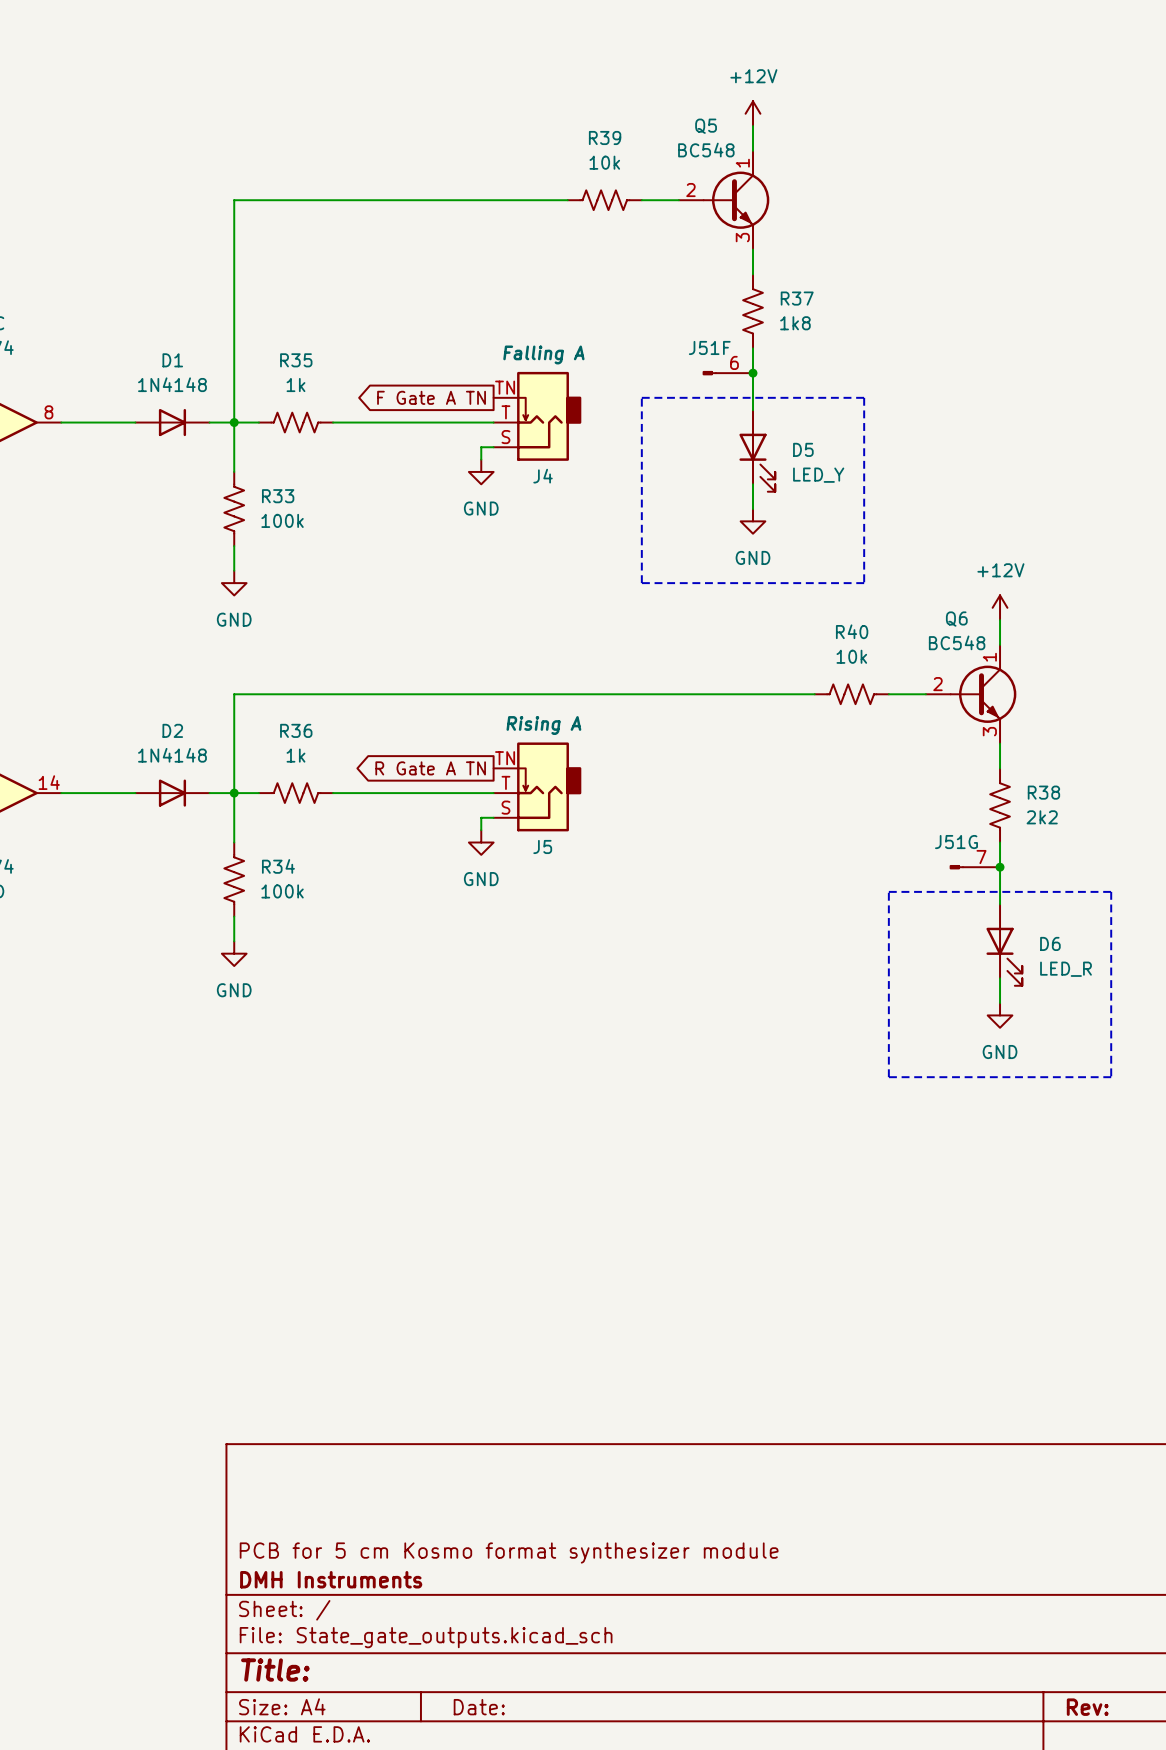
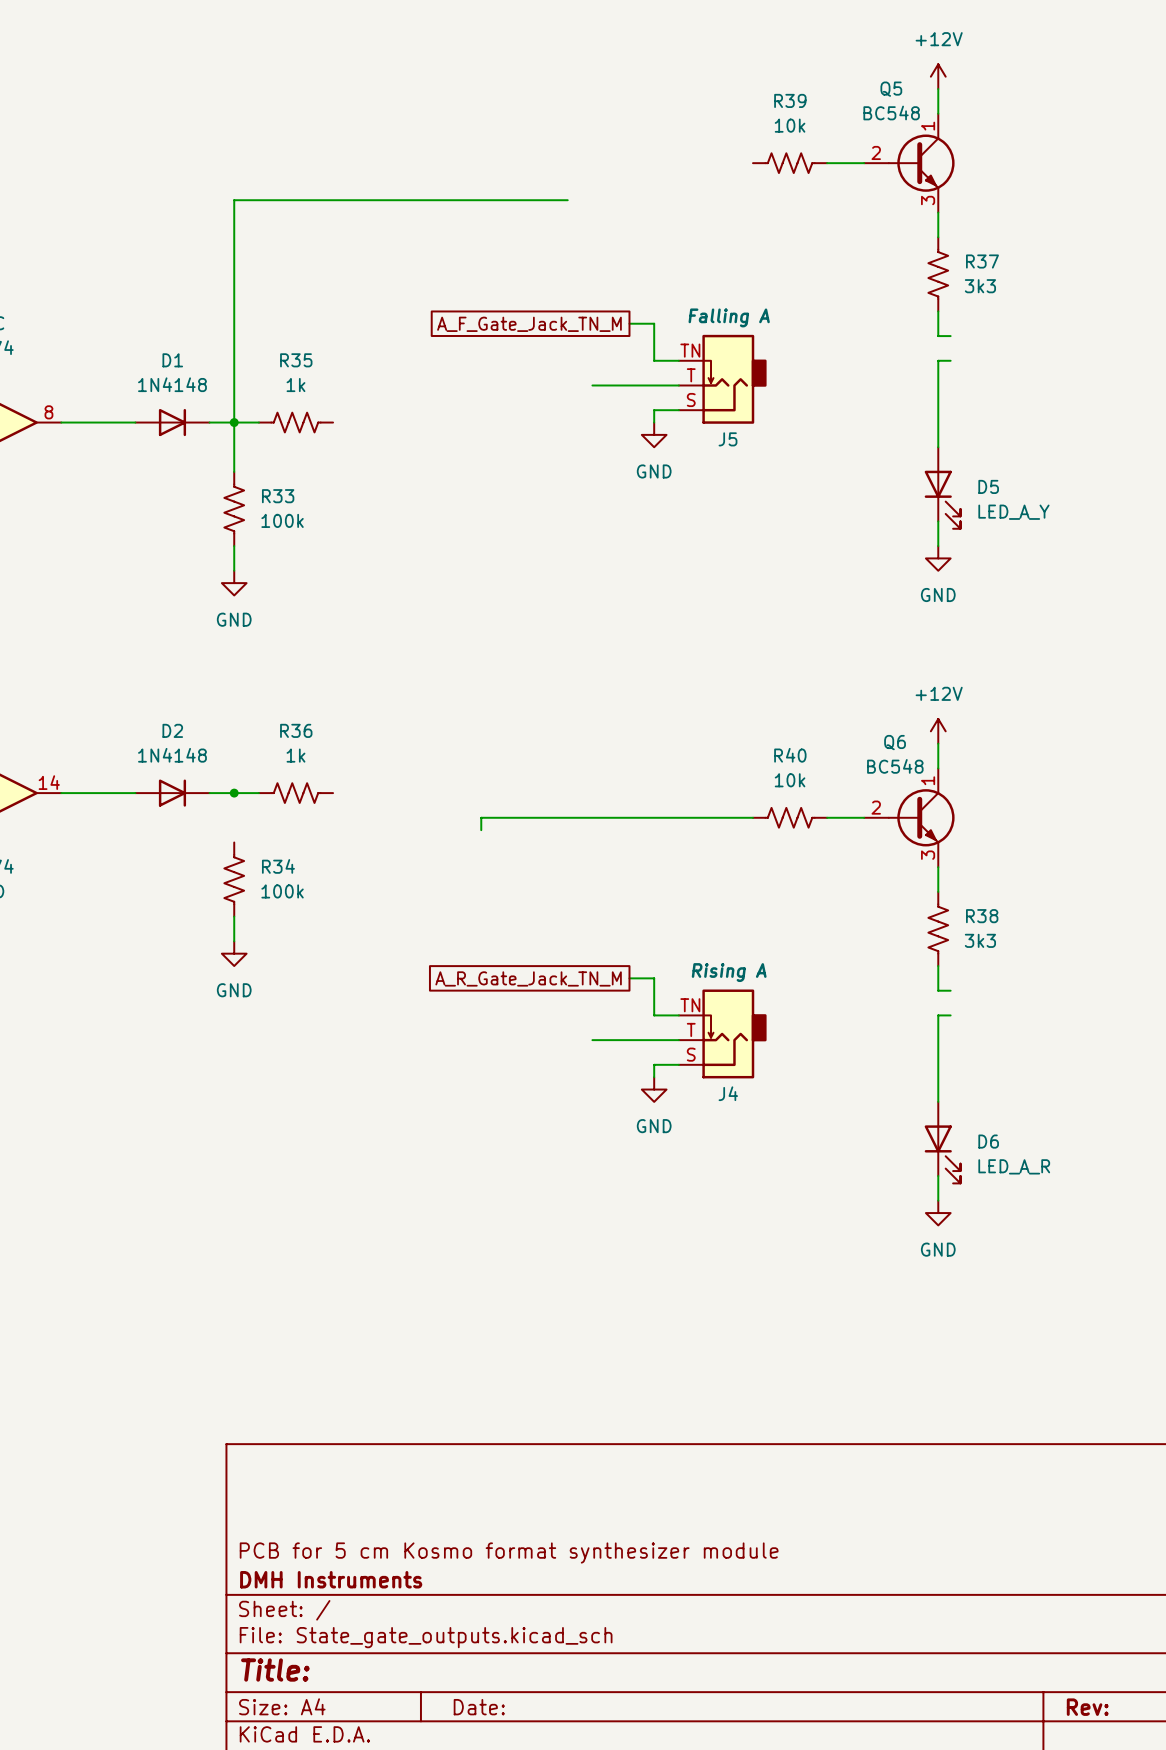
power symbol position: +12V (753, 113) -> +12V (938, 76)
wire: (753, 126) (753, 150) -> (938, 89) (938, 113)
R39 position: (604, 200) -> (790, 163)
wire: (641, 200) (678, 200) -> (827, 163) (864, 163)
Q5 position: (724, 200) -> (909, 163)
wire: (753, 249) (753, 274) -> (938, 212) (938, 237)
R37 position: (753, 311) -> (938, 274)
wire: none -> (938, 311) (938, 336) (950, 336)
wire: none -> (629, 323) (654, 323) (654, 360) (678, 360)
R37 value: 1k8 (795, 323) -> 3k3 (980, 286)
global label: none -> A_F_Gate_Jack_TN_M (529, 324)
J4 text: Falling A (543, 354) -> Rising A (729, 972)
wire: none -> (950, 360) (938, 360) (938, 447)
J51F: (727, 373) -> none
junction: (753, 373) -> none
wire: none -> (592, 385) (678, 385)
global label: F Gate A TN (431, 397) -> none
line: (641, 397) (864, 397) (864, 583) (641, 583) (641, 397) -> none
wire: none -> (678, 410) (654, 410) (654, 422)
J4 position: (537, 416) -> (722, 1033)
wire: (333, 422) (493, 422) -> none
power symbol: none -> GND (654, 434)
wire: (493, 447) (481, 447) (481, 459) -> none
D5 position: (757, 450) -> (942, 488)
power symbol: GND (481, 471) -> none
D5 value: LED_Y (818, 475) -> LED_A_Y (1013, 512)
wire: (753, 484) (753, 509) -> (938, 521) (938, 546)
power symbol: GND (753, 521) -> none
power symbol: none -> GND (938, 558)
power symbol position: +12V (1000, 607) -> +12V (938, 731)
wire: (1000, 620) (1000, 644) -> (938, 743) (938, 768)
wire: (814, 694) (234, 694) (234, 842) -> none
R40 position: (851, 694) -> (790, 817)
wire: (888, 694) (925, 694) -> (827, 817) (864, 817)
Q6 position: (971, 694) -> (909, 817)
J5 text: Rising A (543, 725) -> Falling A (729, 317)
wire: (1000, 743) (1000, 768) -> (938, 867) (938, 891)
global label: R Gate A TN (430, 768) -> none
J5 position: (537, 786) -> (722, 379)
wire: (333, 793) (493, 793) -> none
R38 position: (1000, 805) -> (938, 928)
wire: none -> (493, 817) (753, 817)
R38 value: 2k2 (1042, 817) -> 3k3 (980, 940)
power symbol: GND (481, 842) -> none
wire: (1000, 842) (1000, 904) -> none
J51G: (974, 867) -> none
junction: (1000, 867) -> none
line: (888, 891) (1111, 891) (1111, 1077) (888, 1077) (888, 891) -> none
D6 position: (1004, 945) -> (942, 1142)
wire: none -> (938, 966) (938, 990) (950, 990)
D6 value: LED_R (1066, 969) -> LED_A_R (1014, 1166)
global label: none -> A_R_Gate_Jack_TN_M (528, 978)
wire: none -> (629, 978) (654, 978) (654, 1015) (678, 1015)
wire: (1000, 978) (1000, 1003) -> (938, 1175) (938, 1200)
wire: none -> (950, 1015) (938, 1015) (938, 1101)
power symbol: GND (1000, 1015) -> none
wire: none -> (592, 1040) (678, 1040)
wire: none -> (678, 1064) (654, 1064) (654, 1077)
power symbol: none -> GND (654, 1089)
power symbol: none -> GND (938, 1213)

